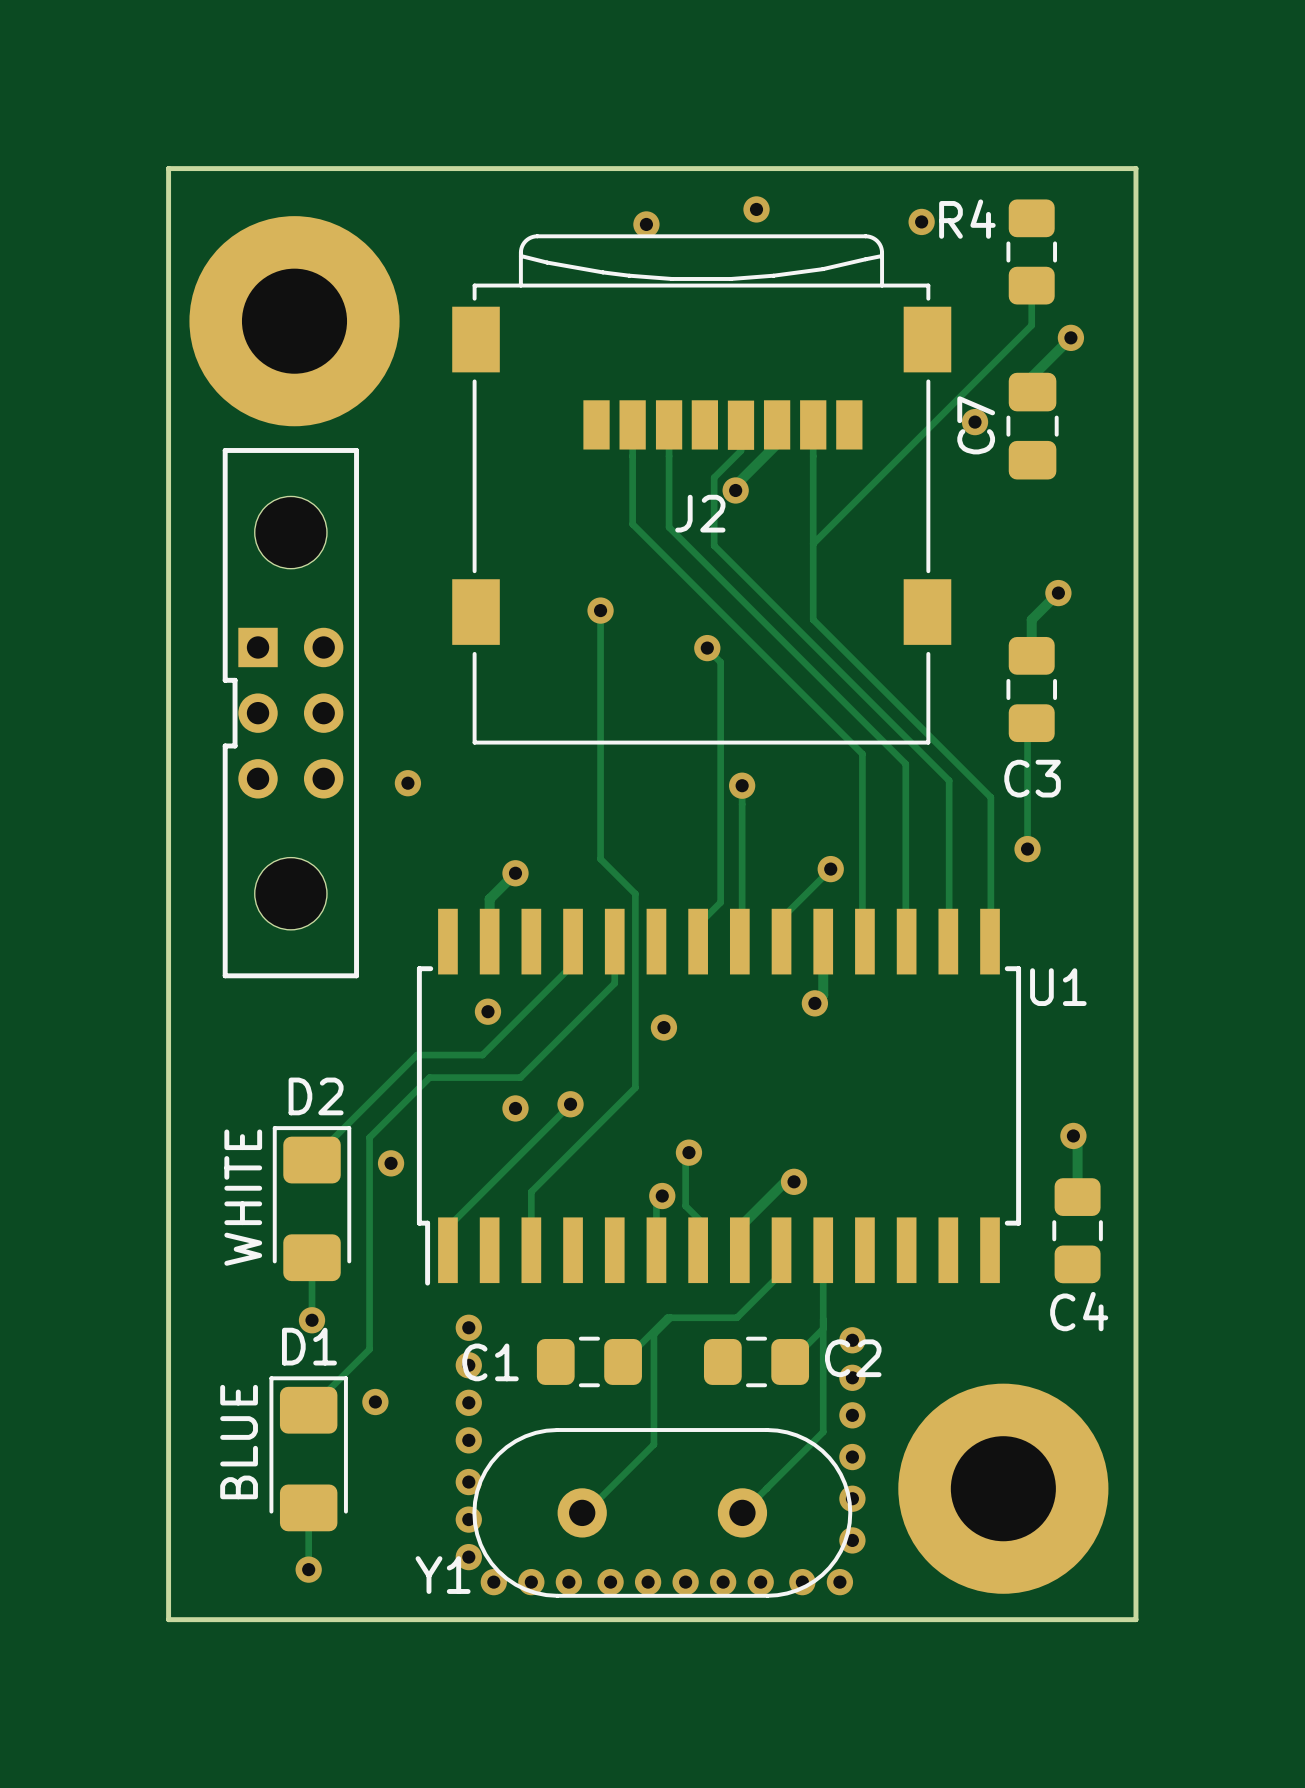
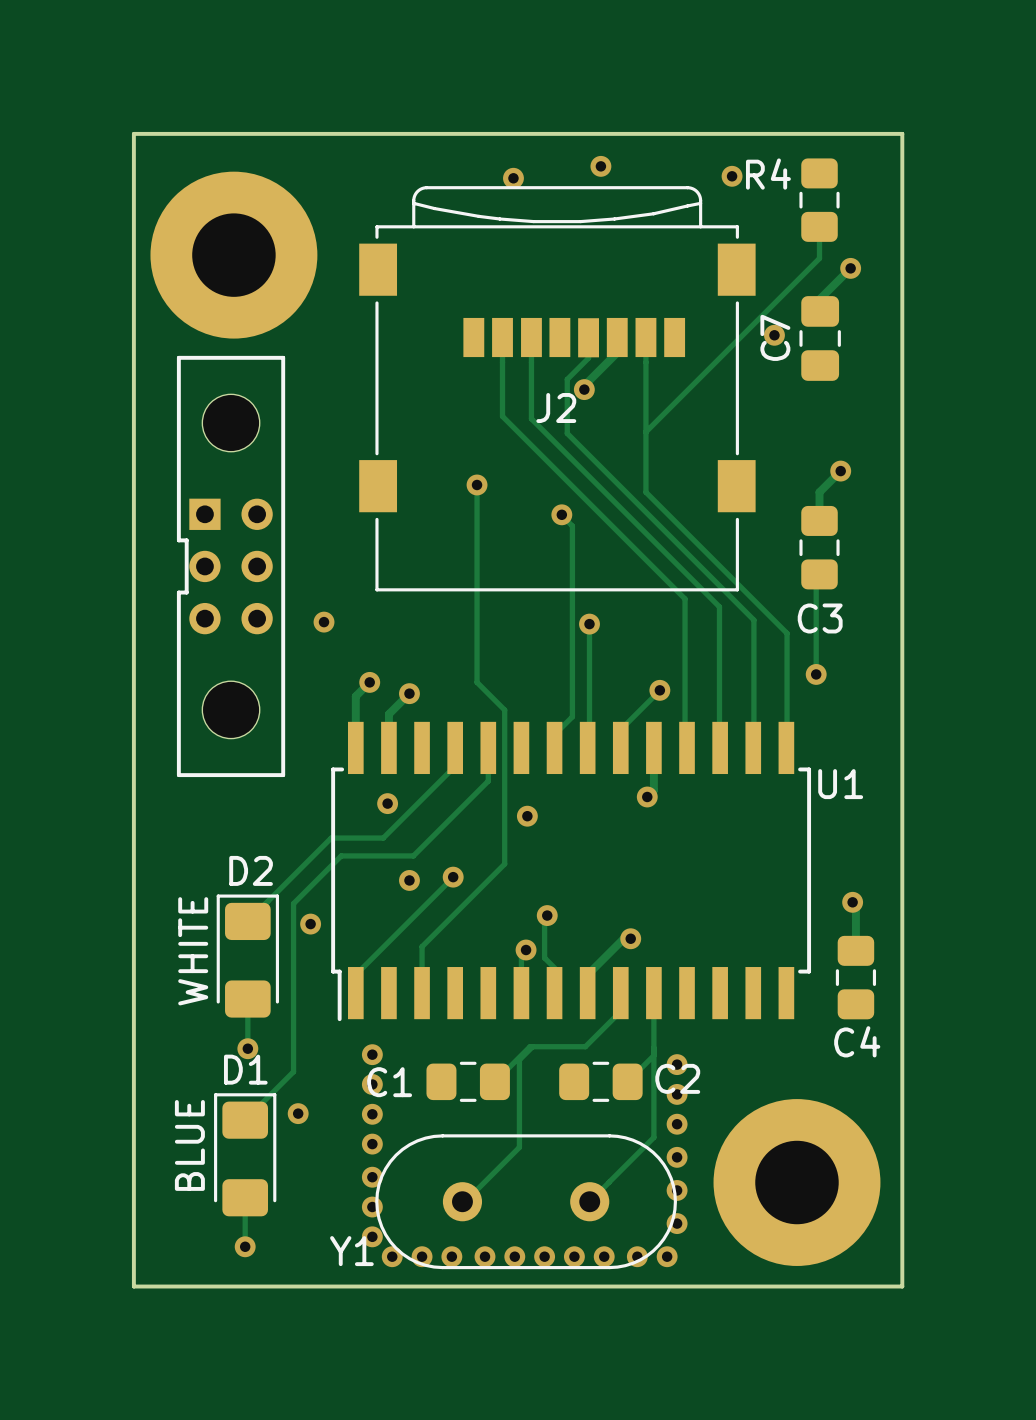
track: none -> (369, 682) (355, 696) (355, 747)
via: none -> (369, 682)

